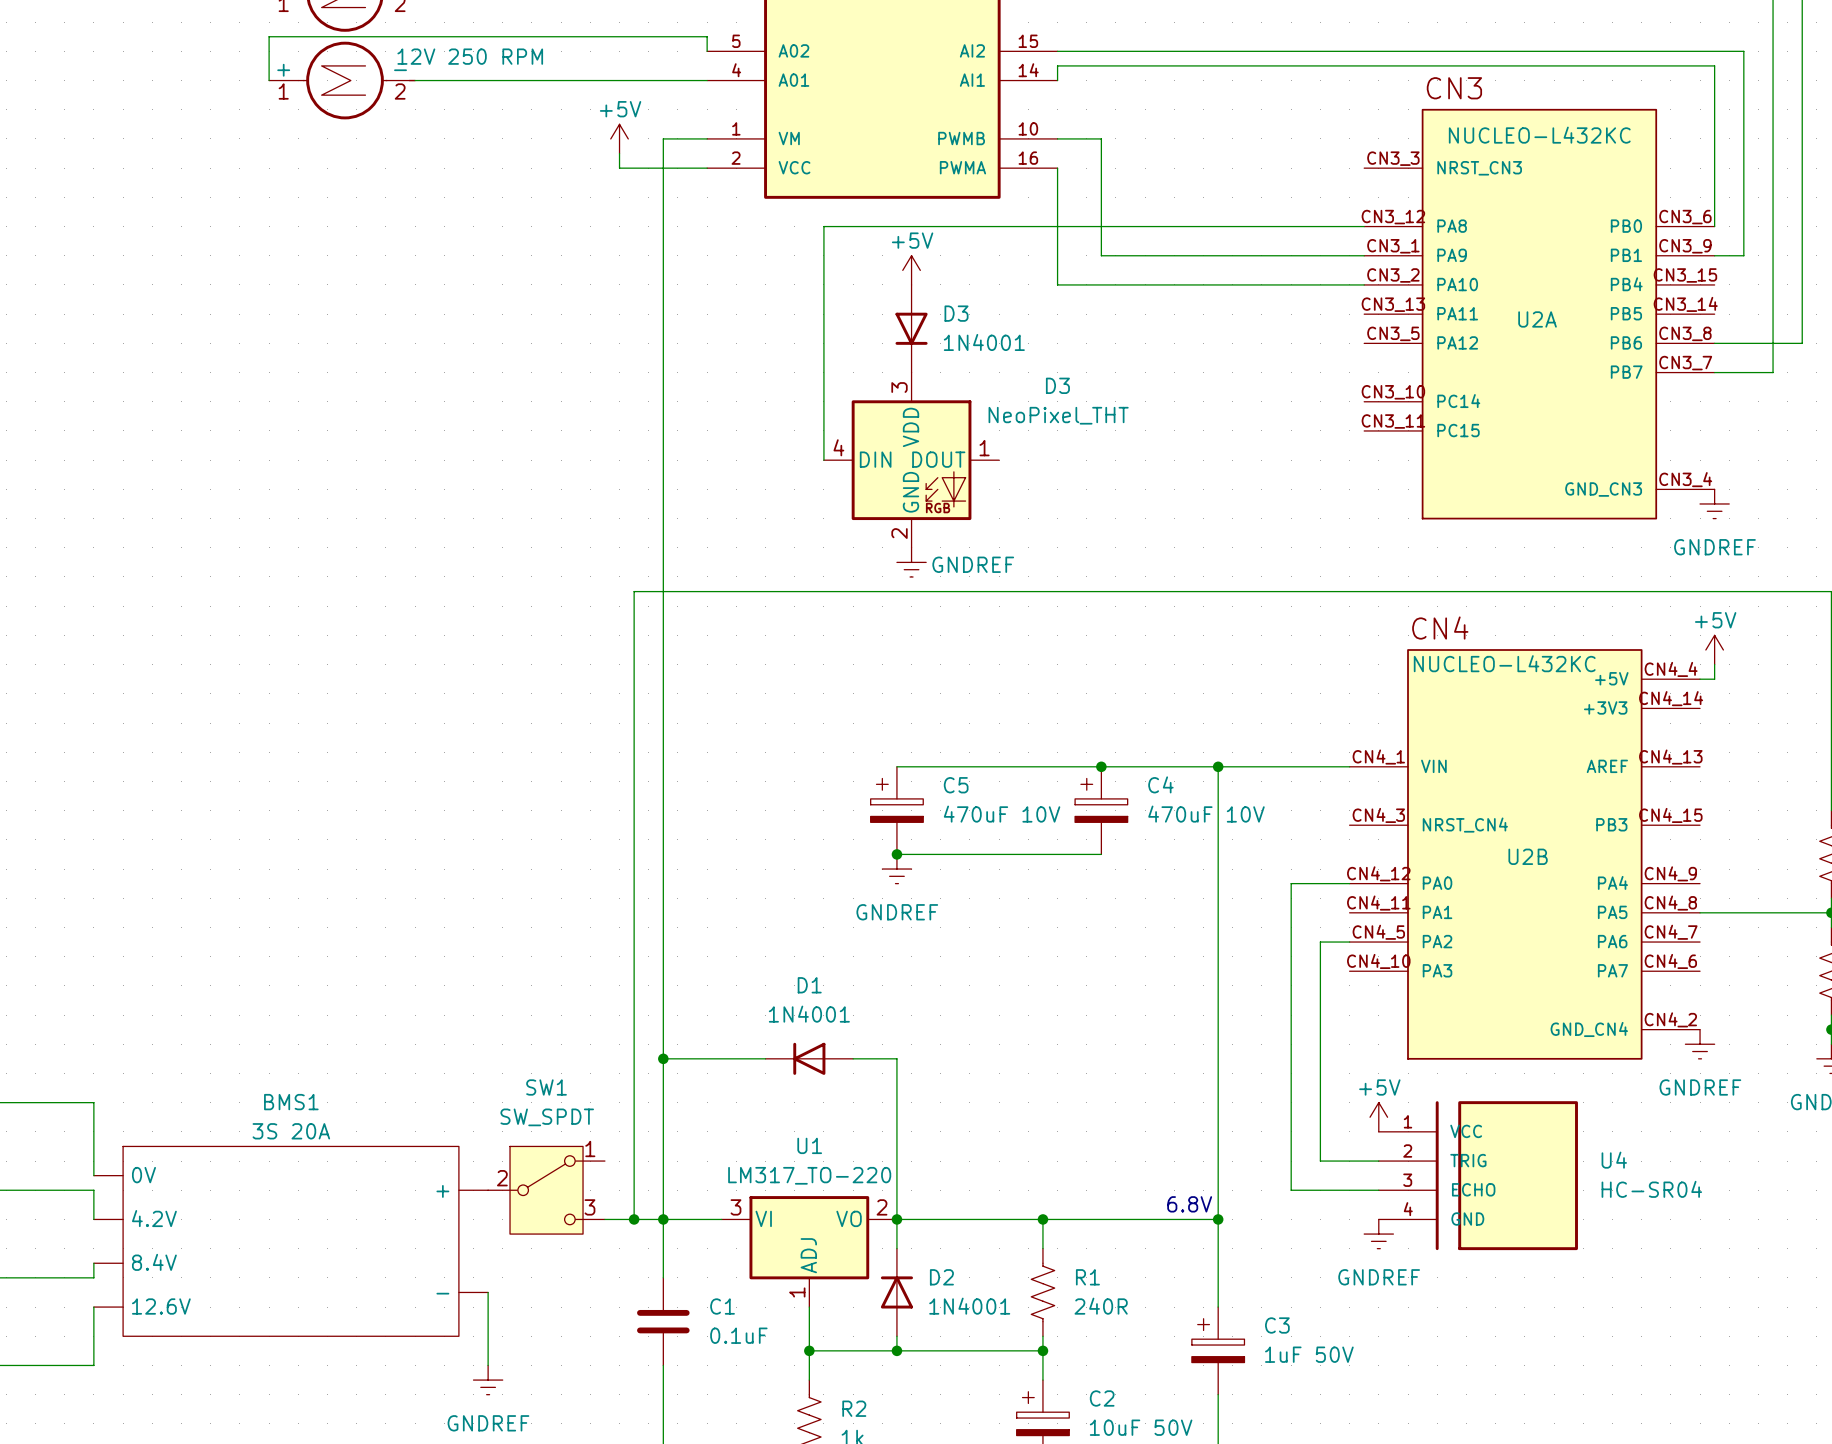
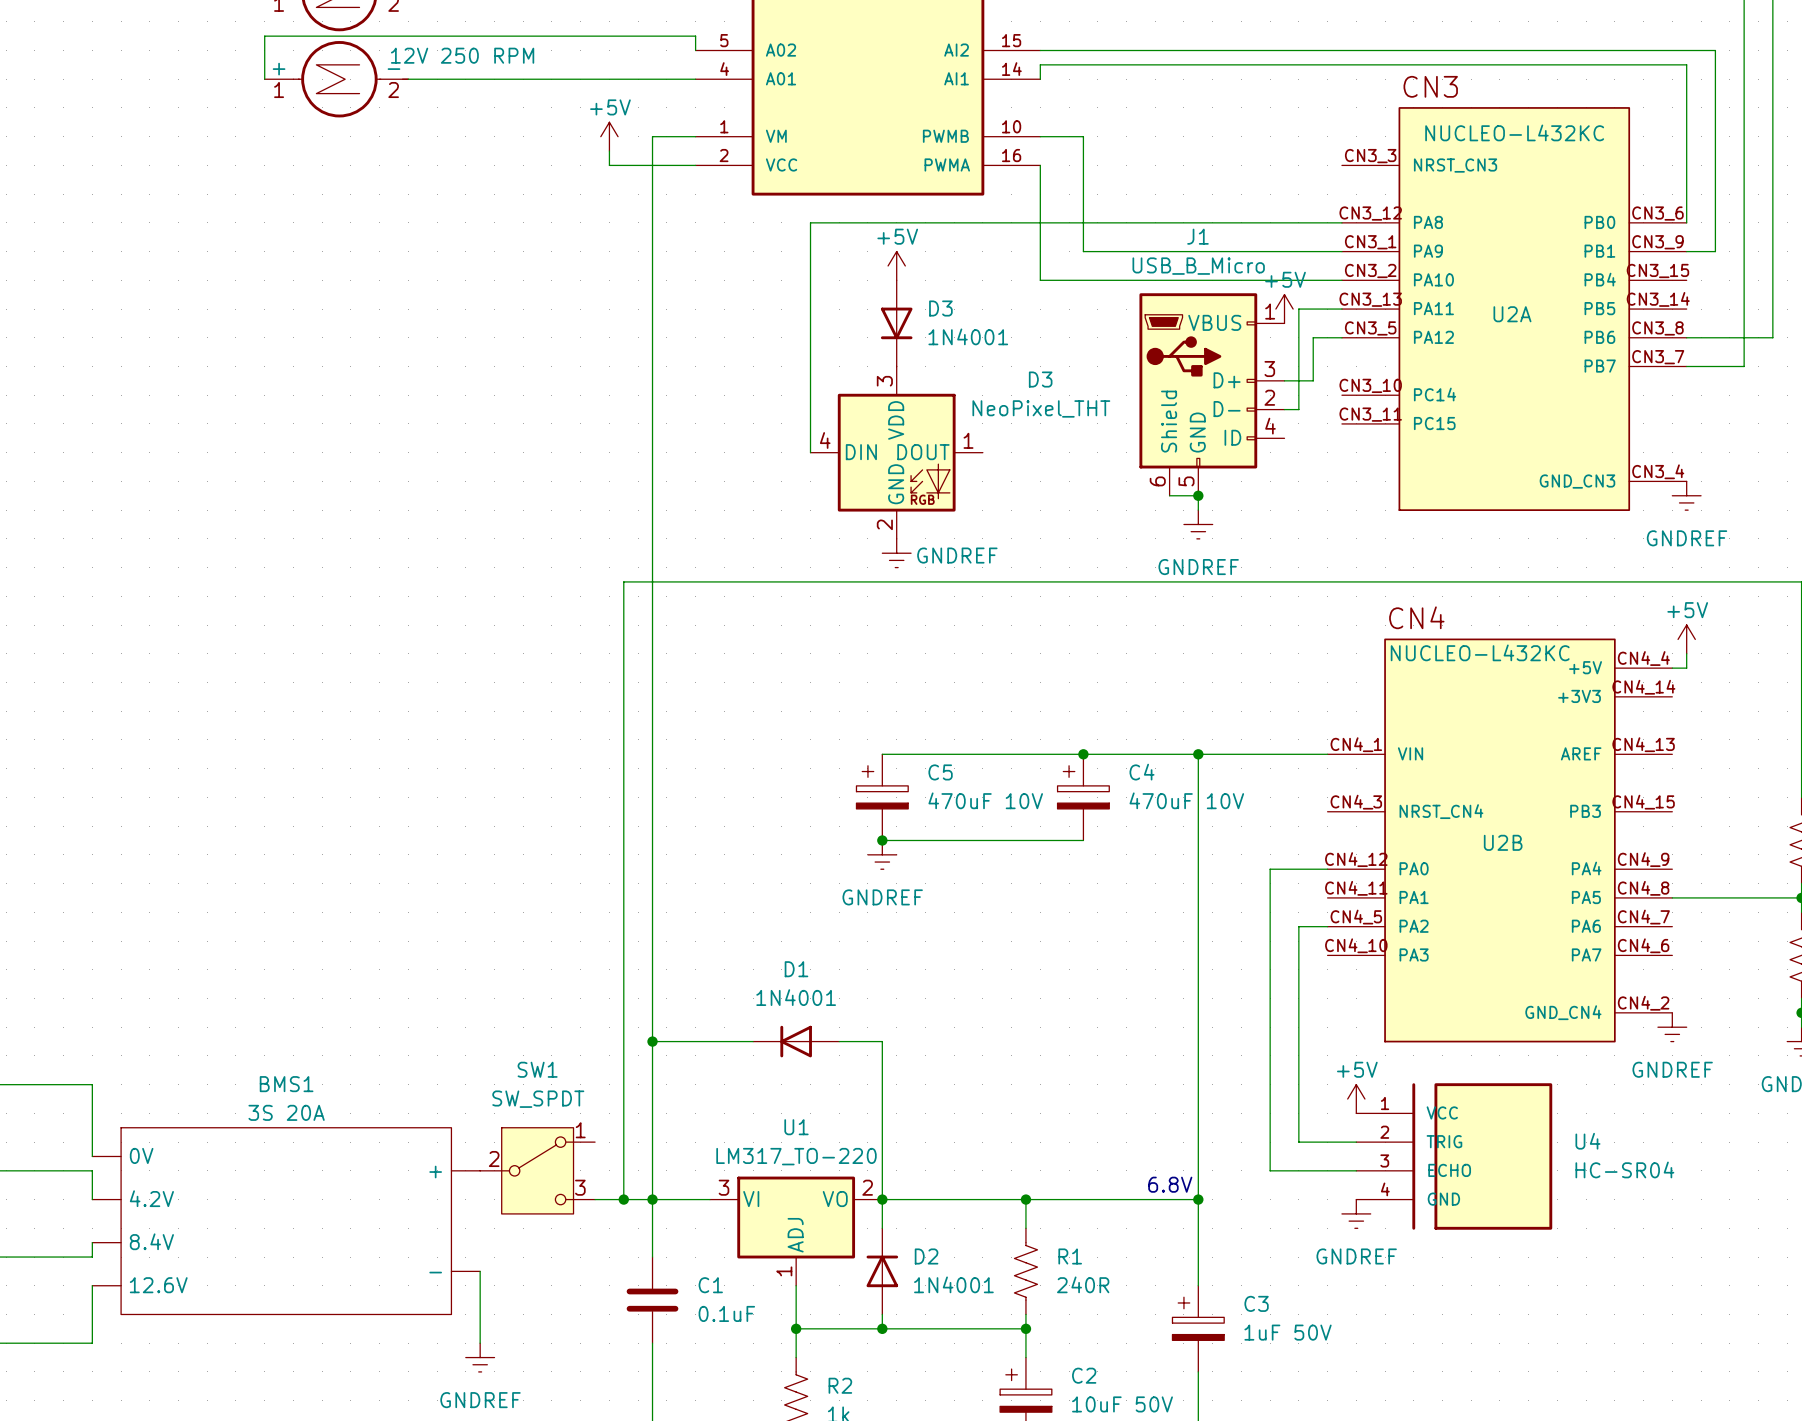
power symbol: none -> +5V (1284, 309)
wire: none -> (1341, 309) (1298, 309) (1298, 409) (1284, 409)
wire: none -> (1341, 337) (1313, 337) (1313, 380) (1284, 380)
J1: none -> USB_B_Micro (1211, 394)
wire: none -> (1169, 495) (1198, 495) (1198, 510)
junction: none -> (1198, 495)
power symbol: none -> GNDREF (1198, 524)

